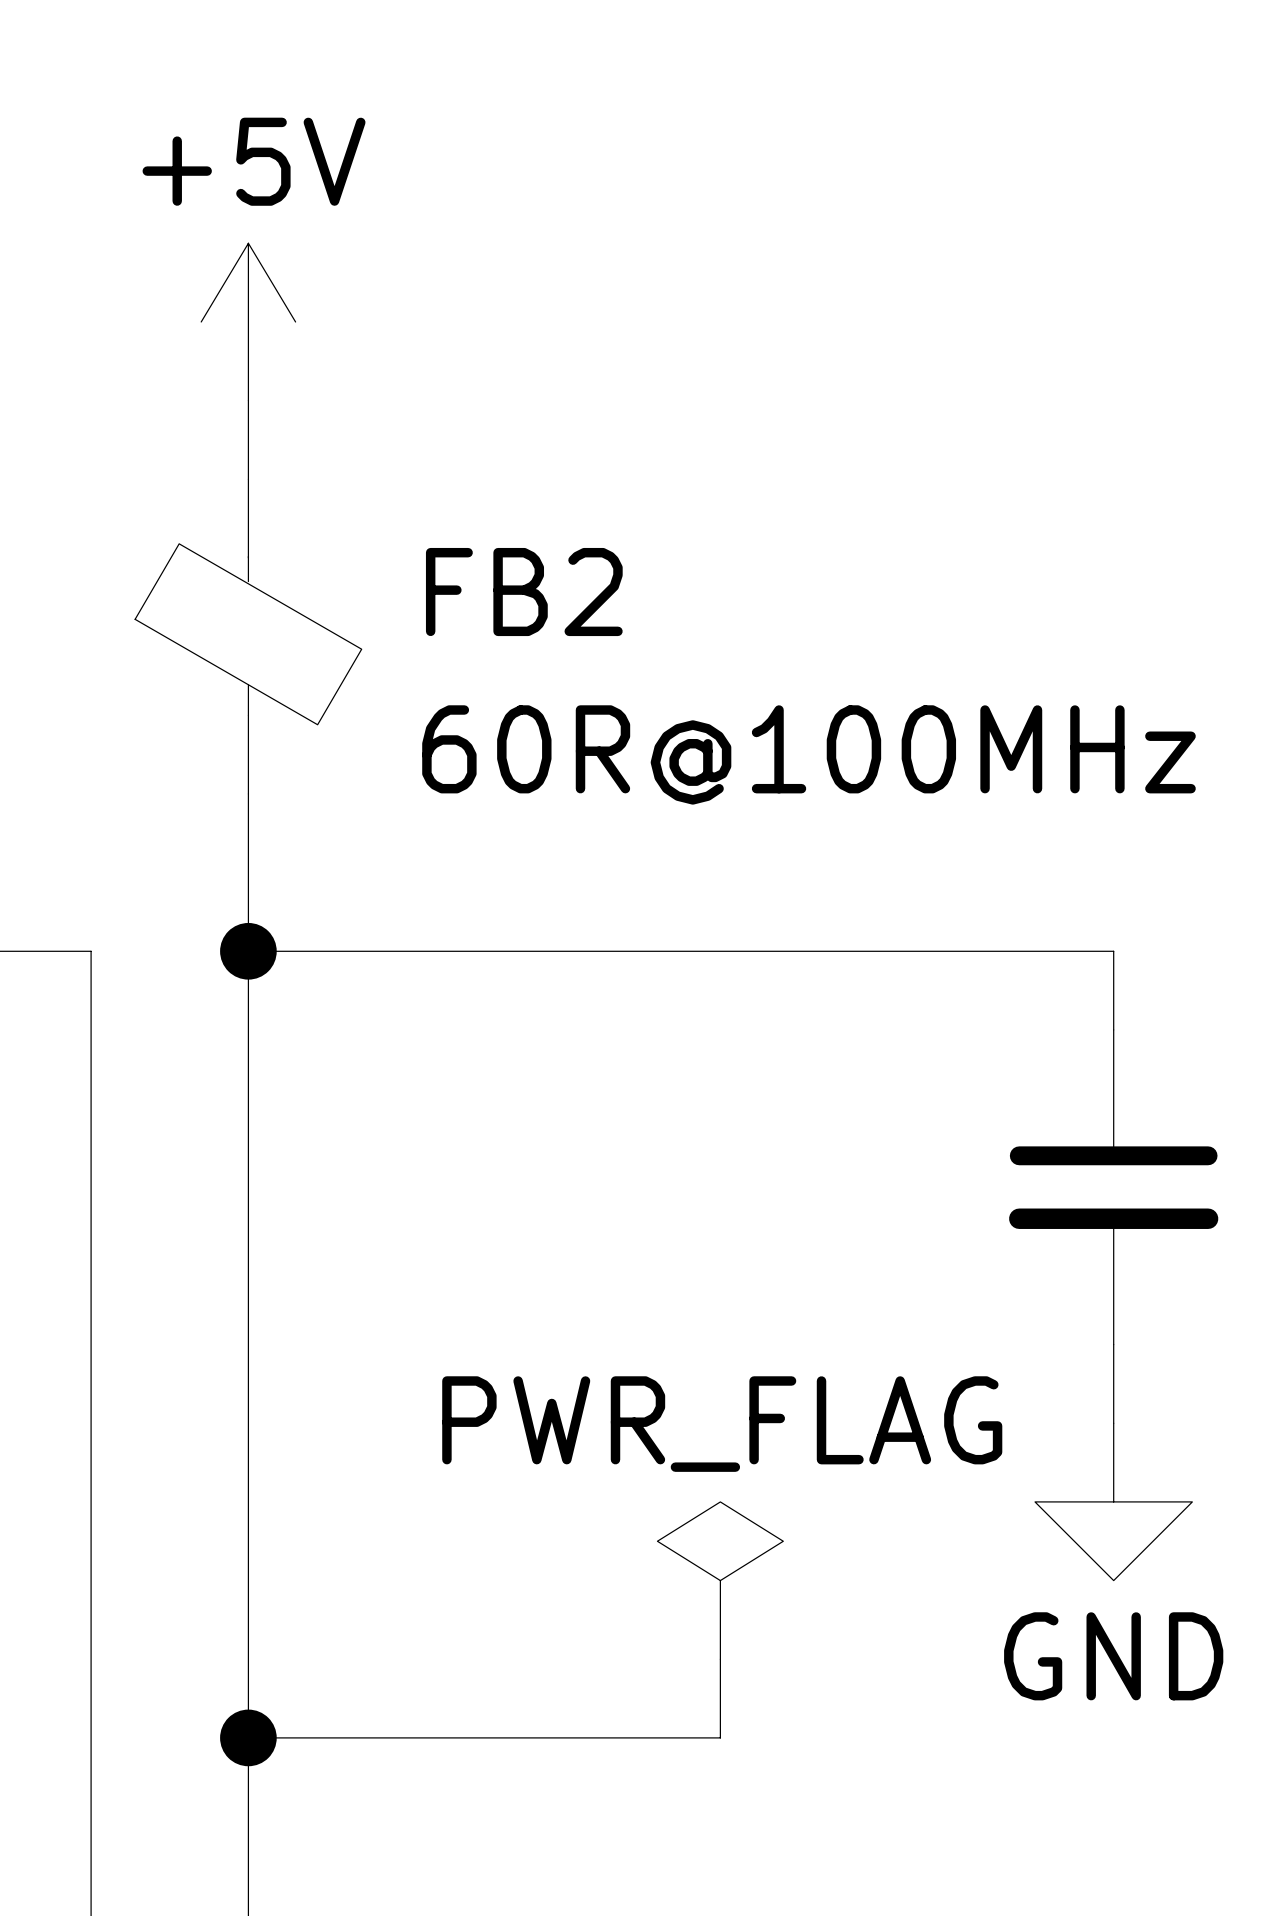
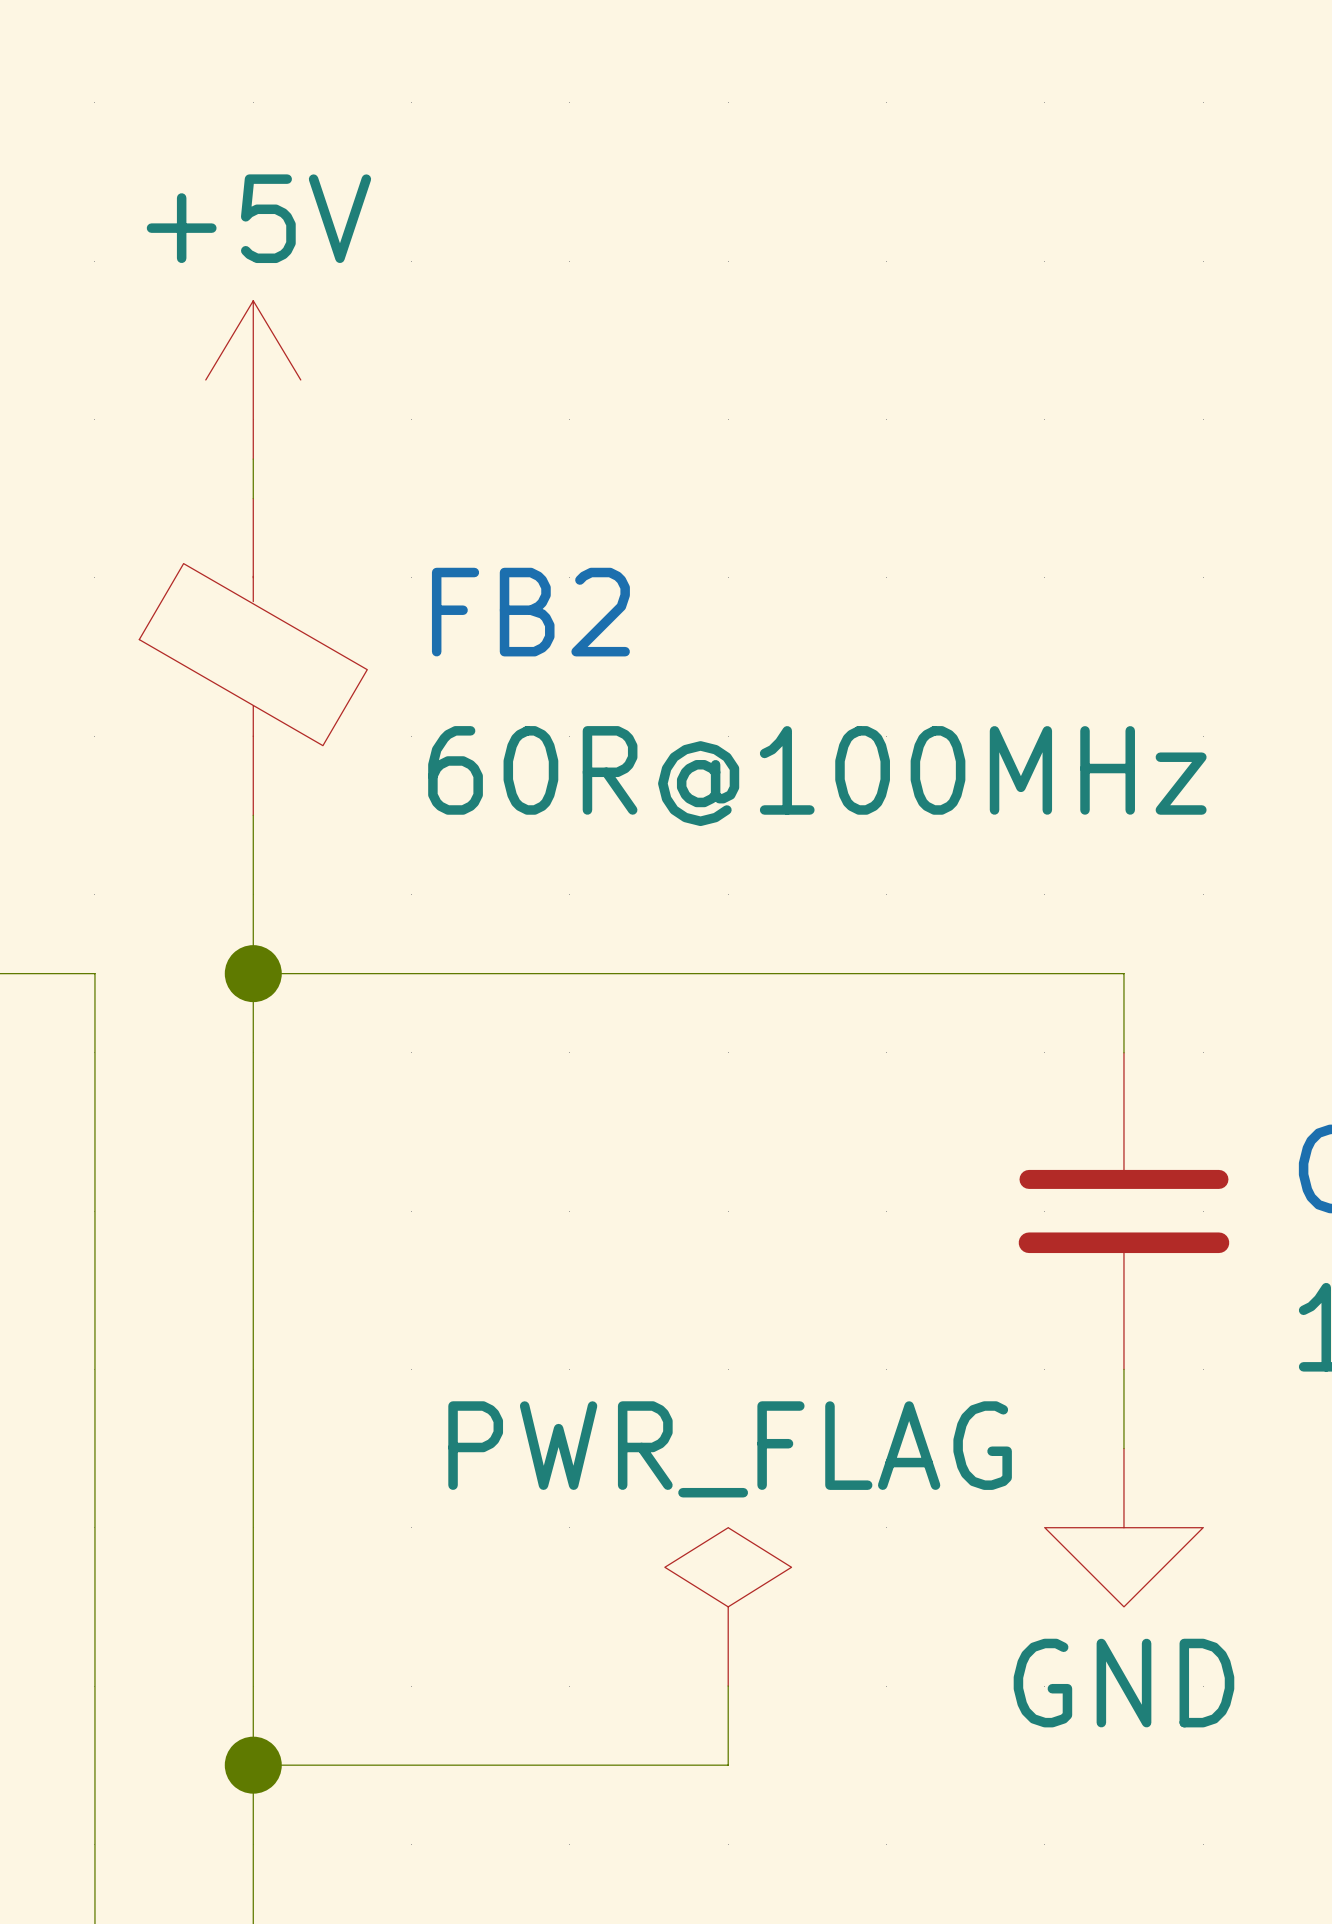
power symbol position: +5V (248, 321) -> +5V (253, 379)

